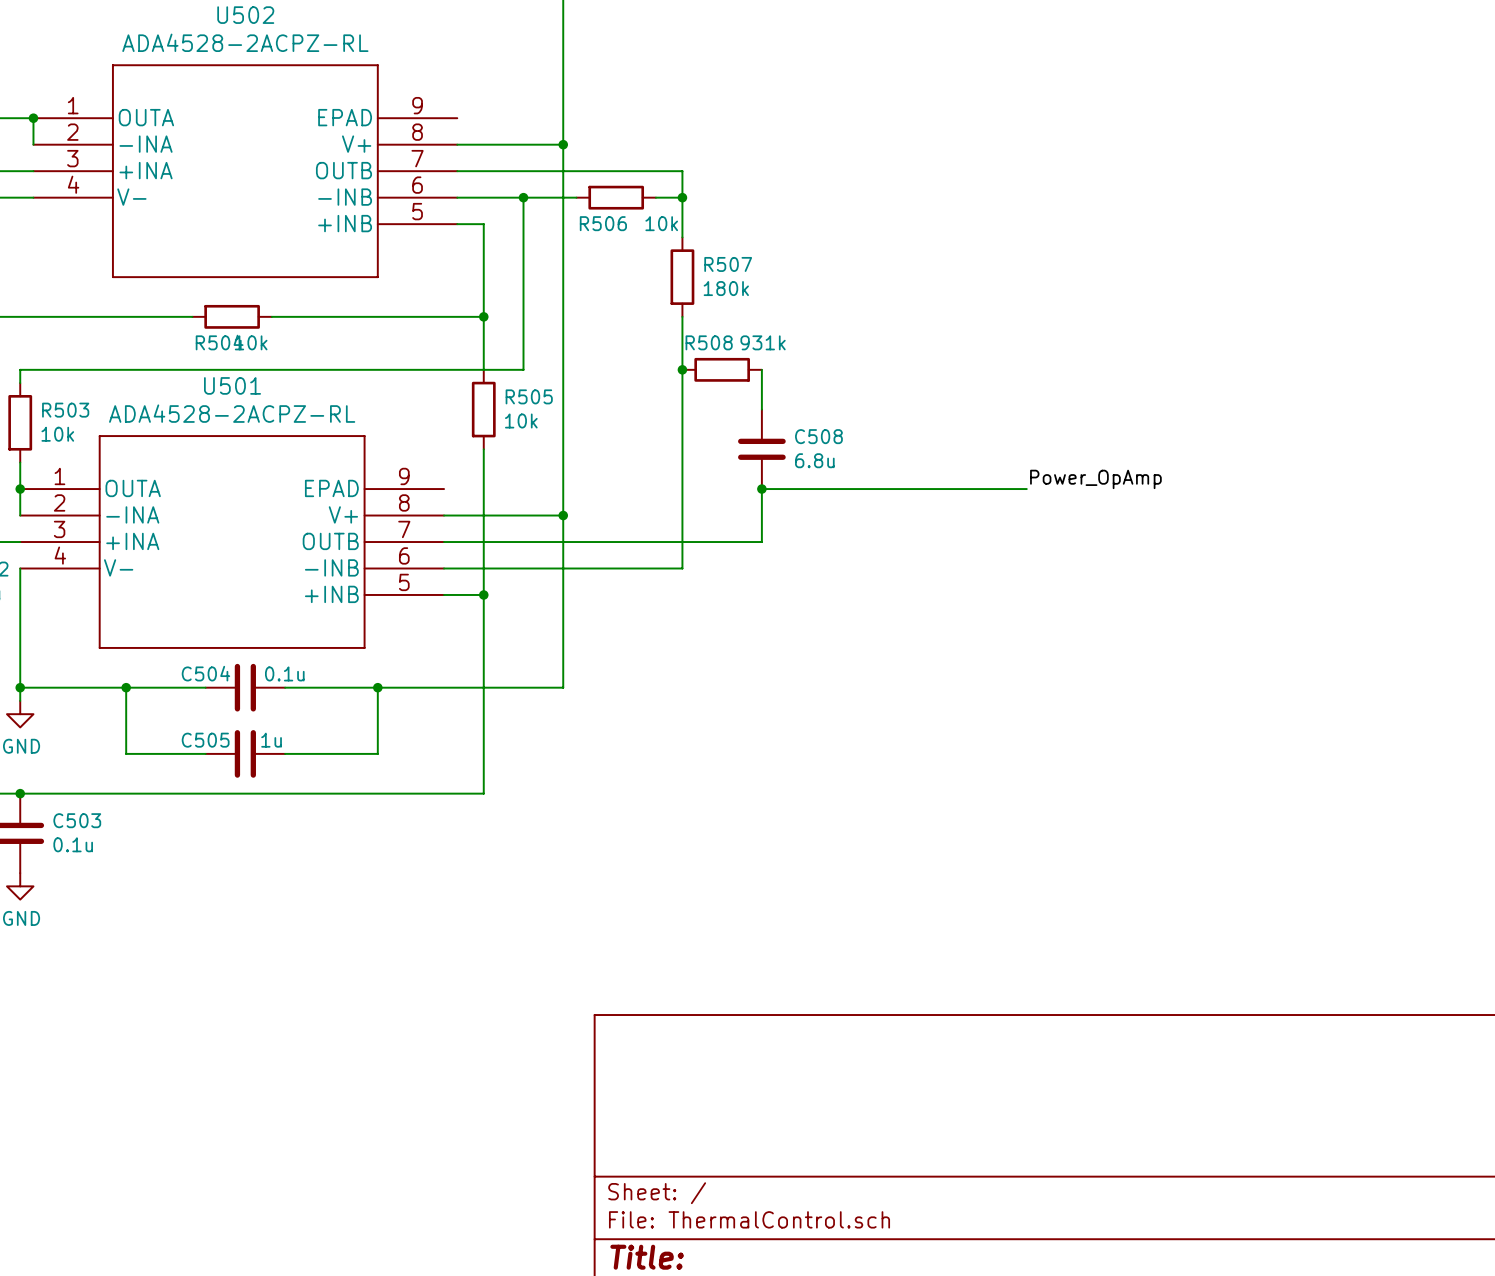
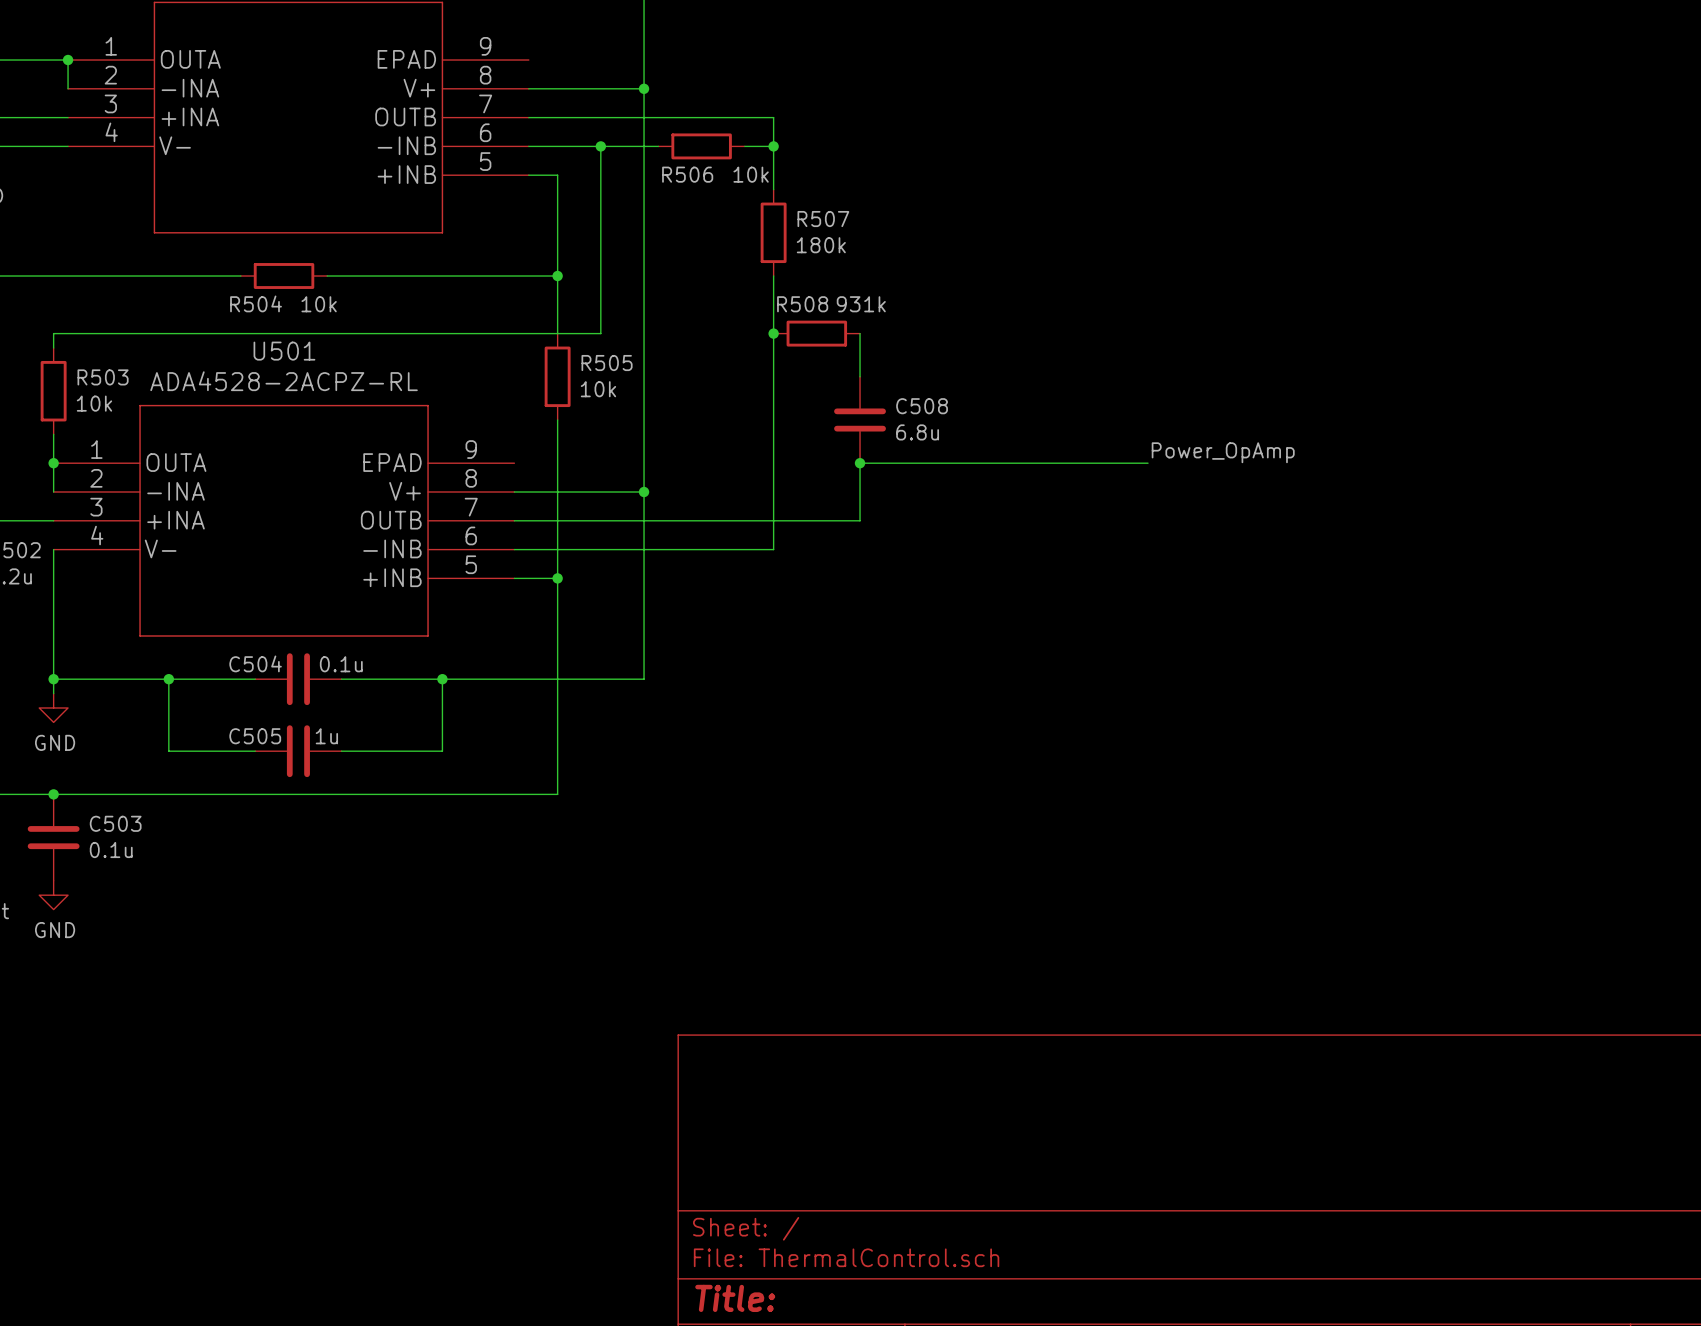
R504 name position: R504 (219, 342) -> R504 (256, 303)
R504 value position: 10k (251, 342) -> 10k (319, 304)

